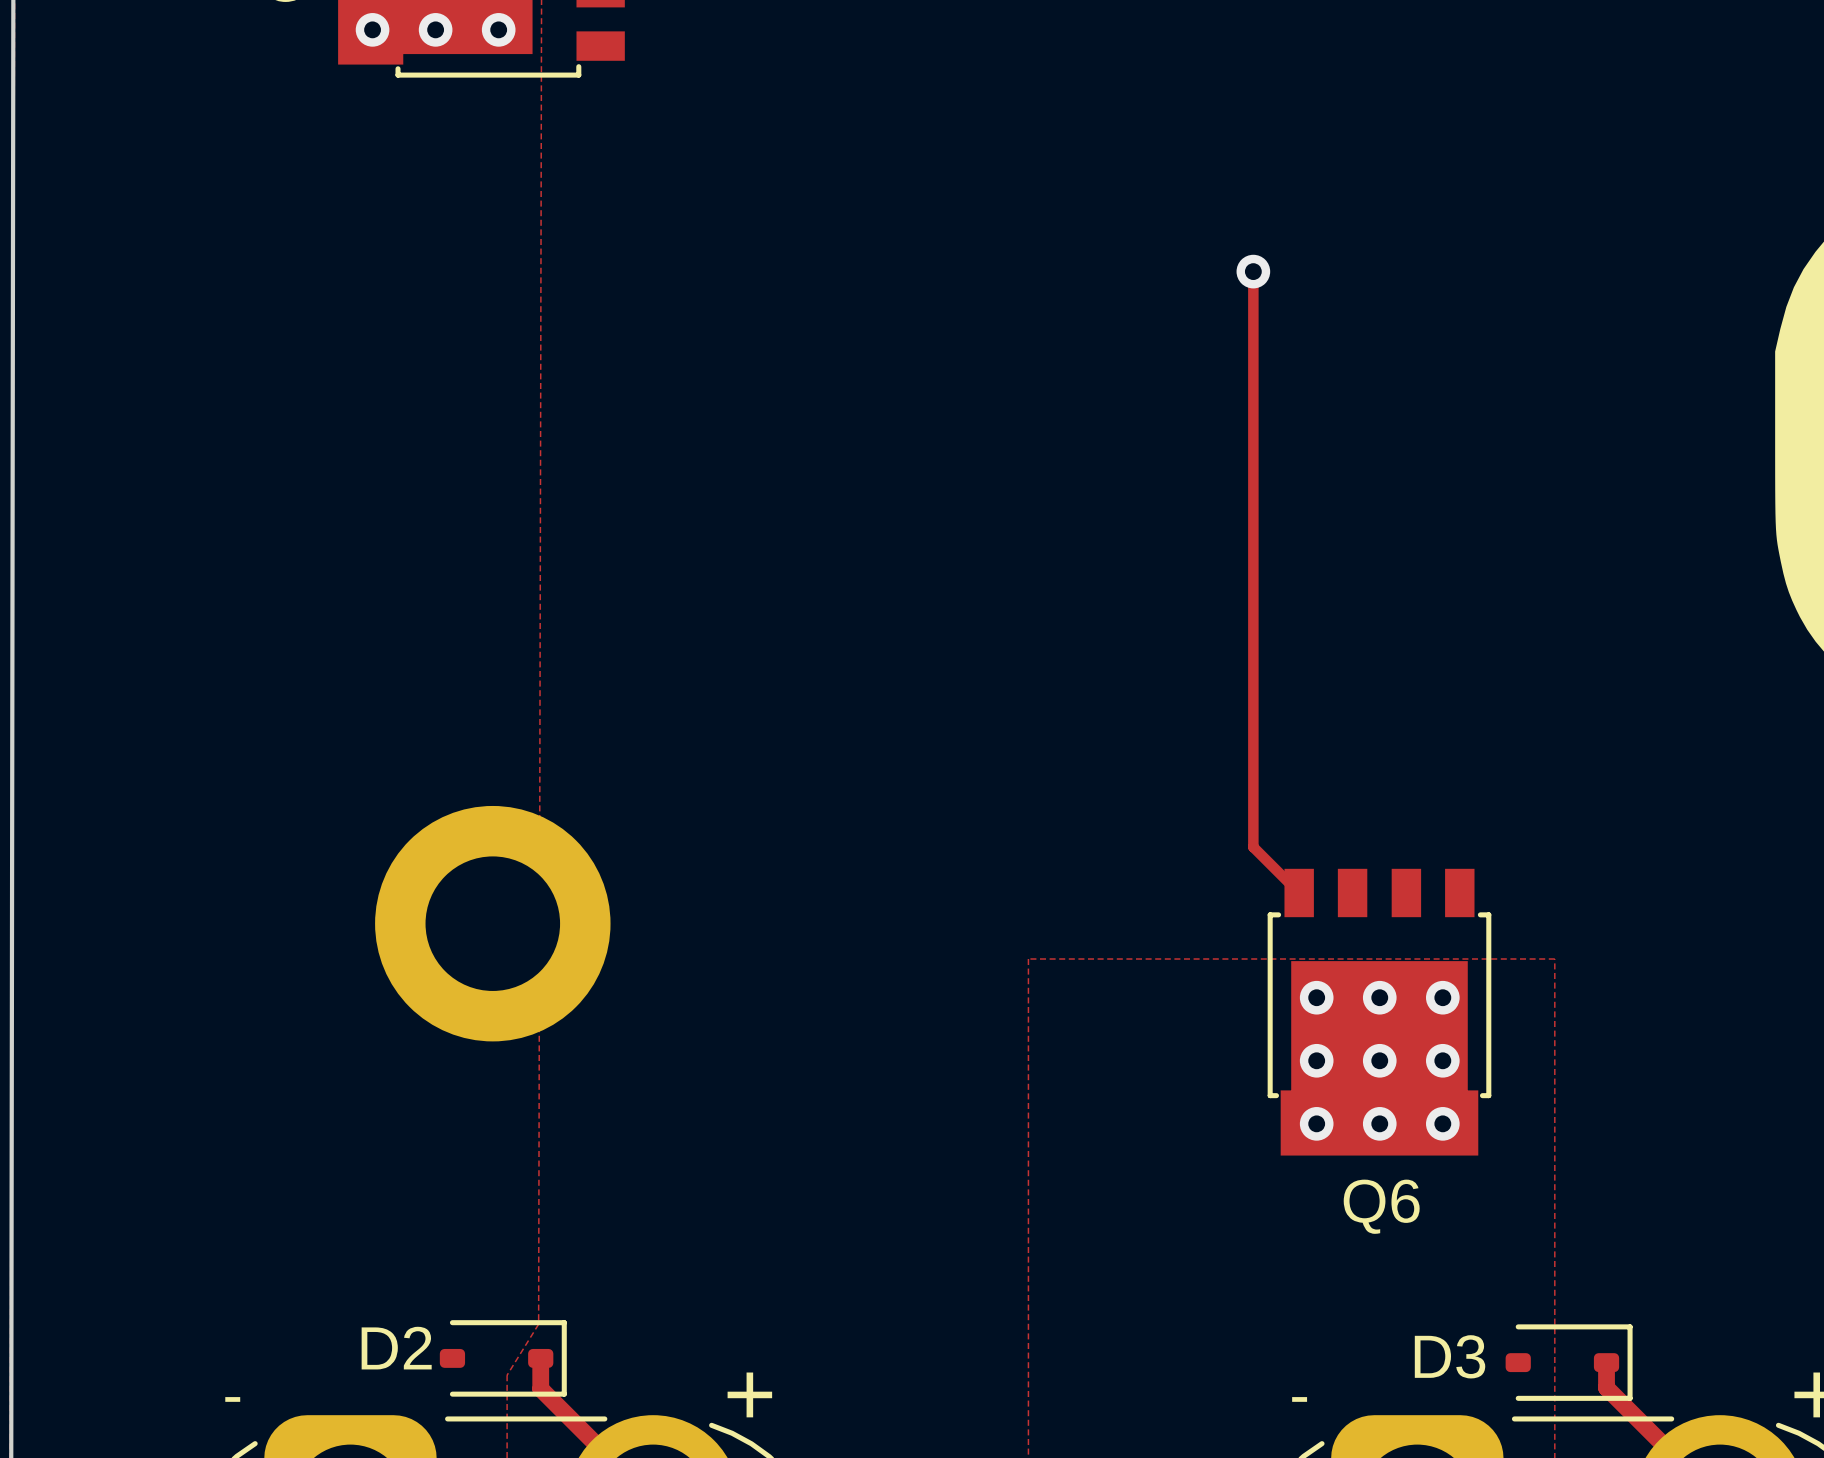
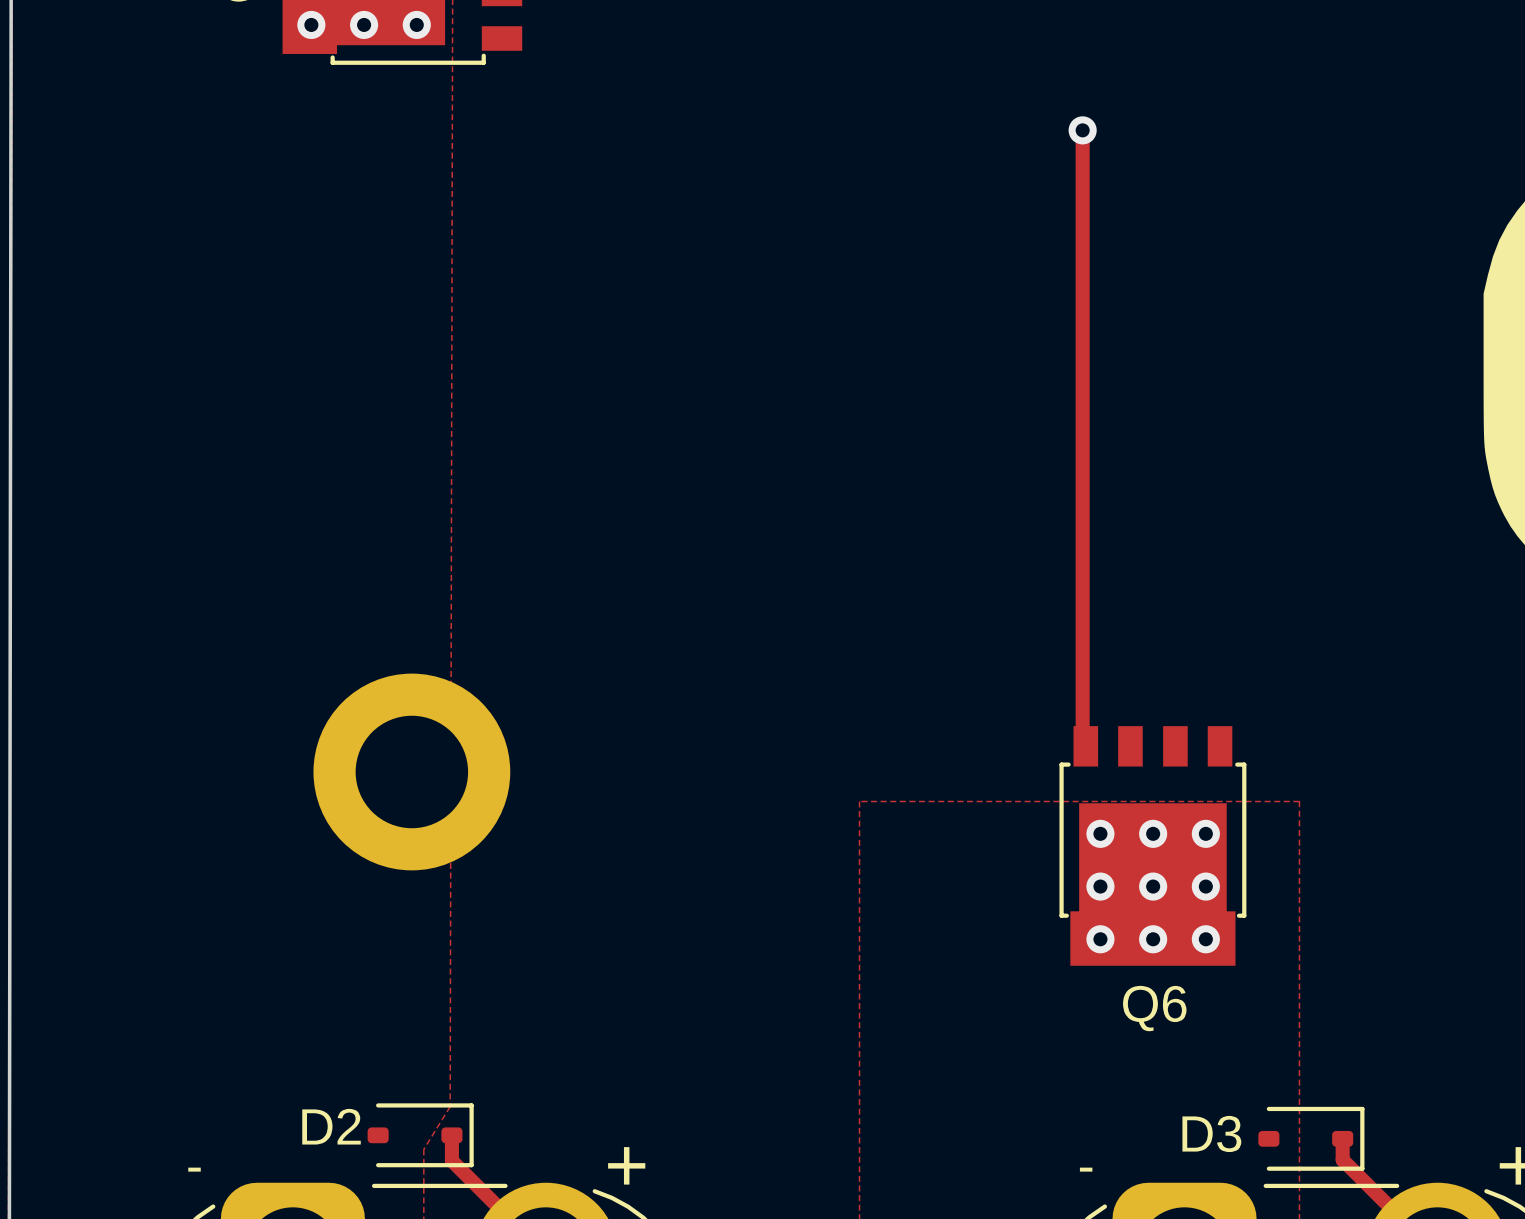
track: (1253, 271) (1253, 847) (1295, 889) -> (1082, 130) (1082, 743)
via position: (1253, 271) -> (1082, 130)

